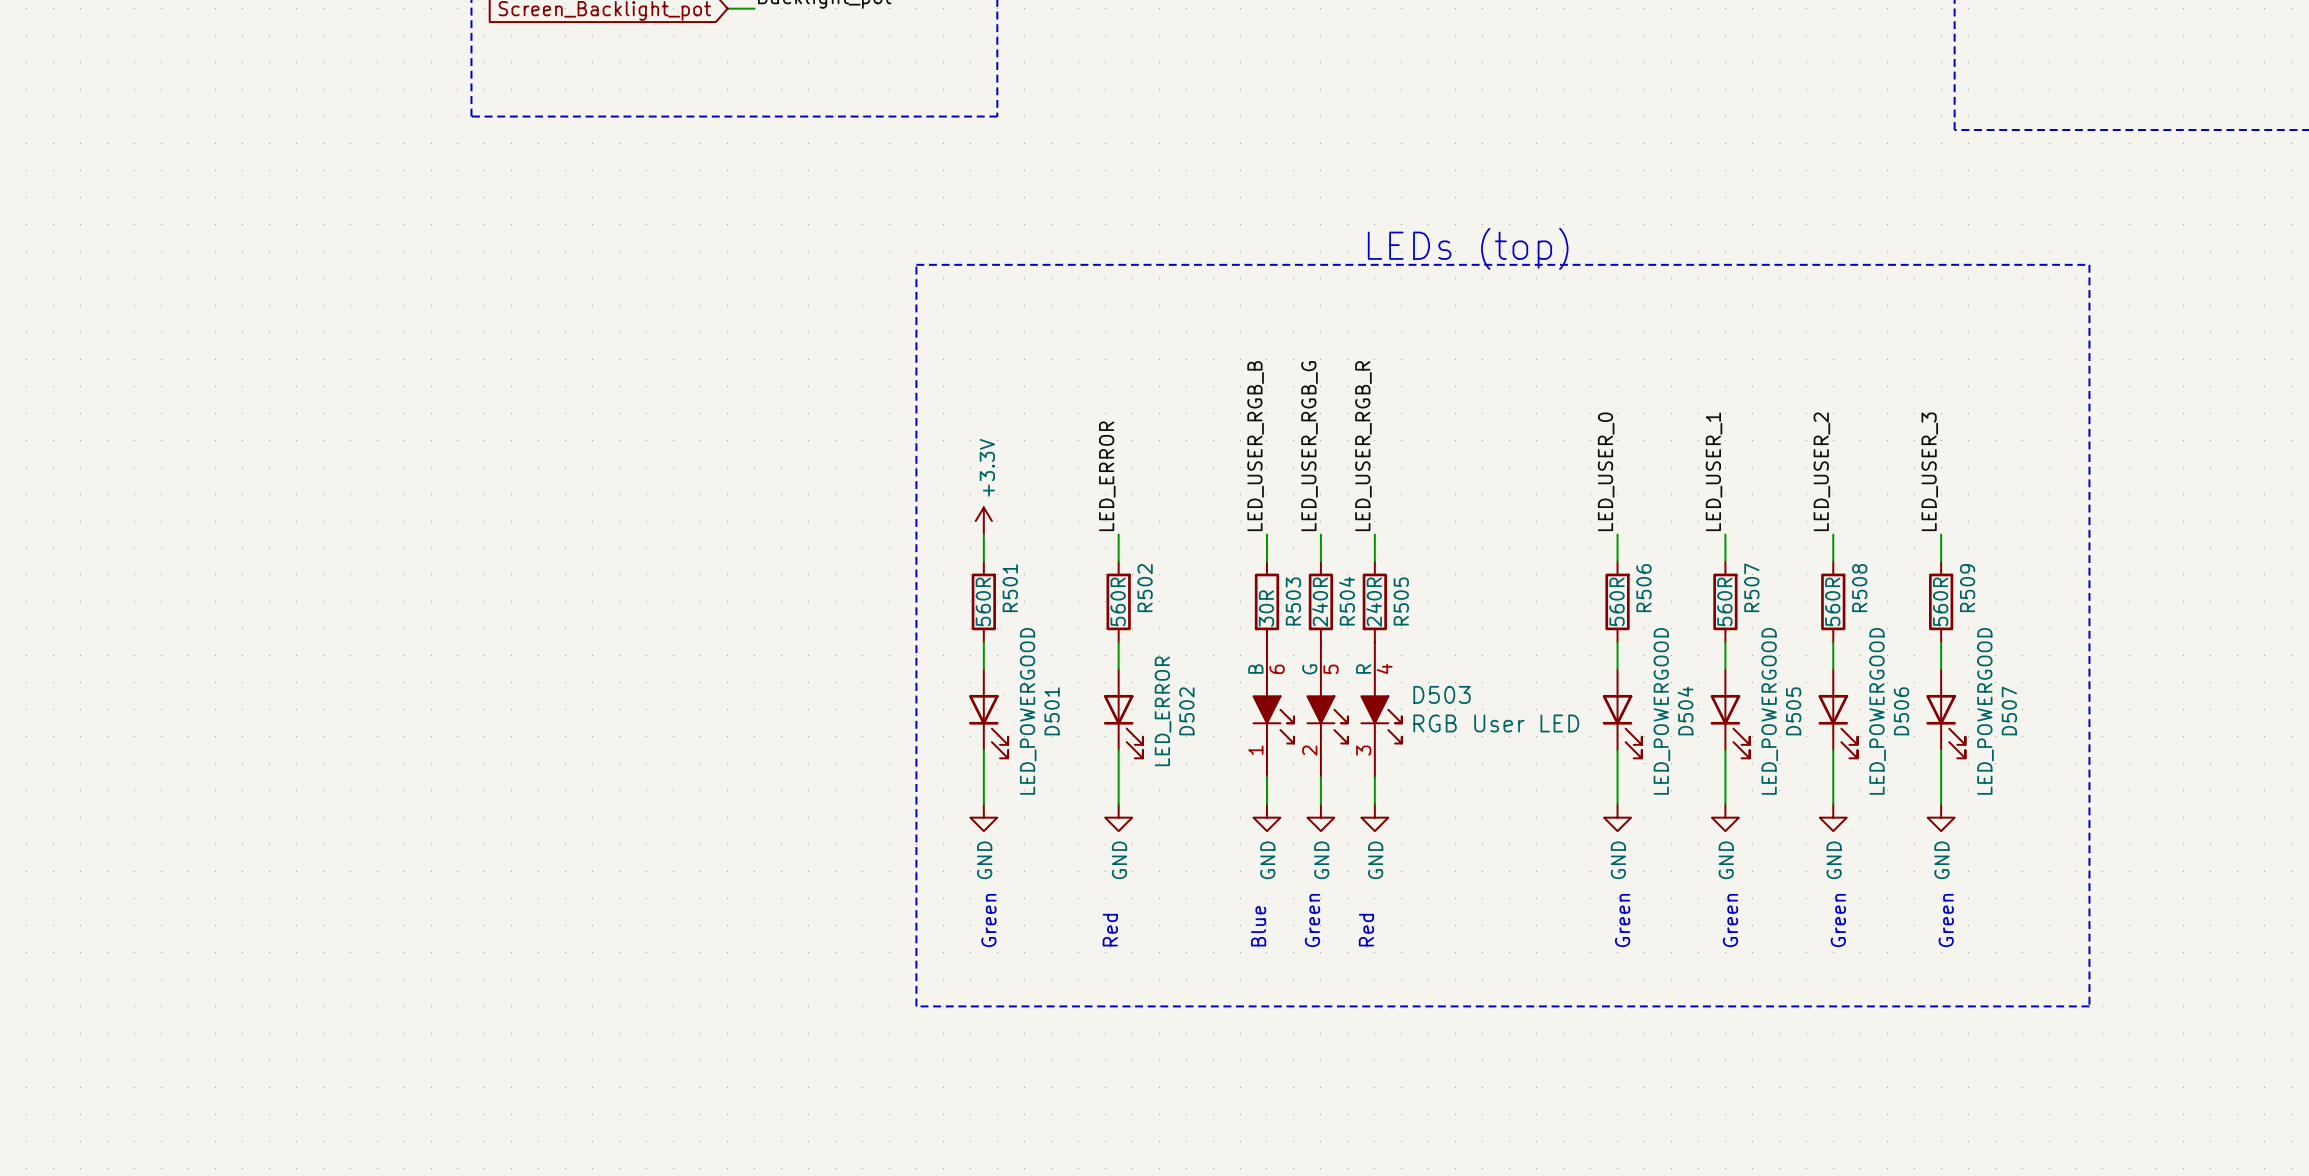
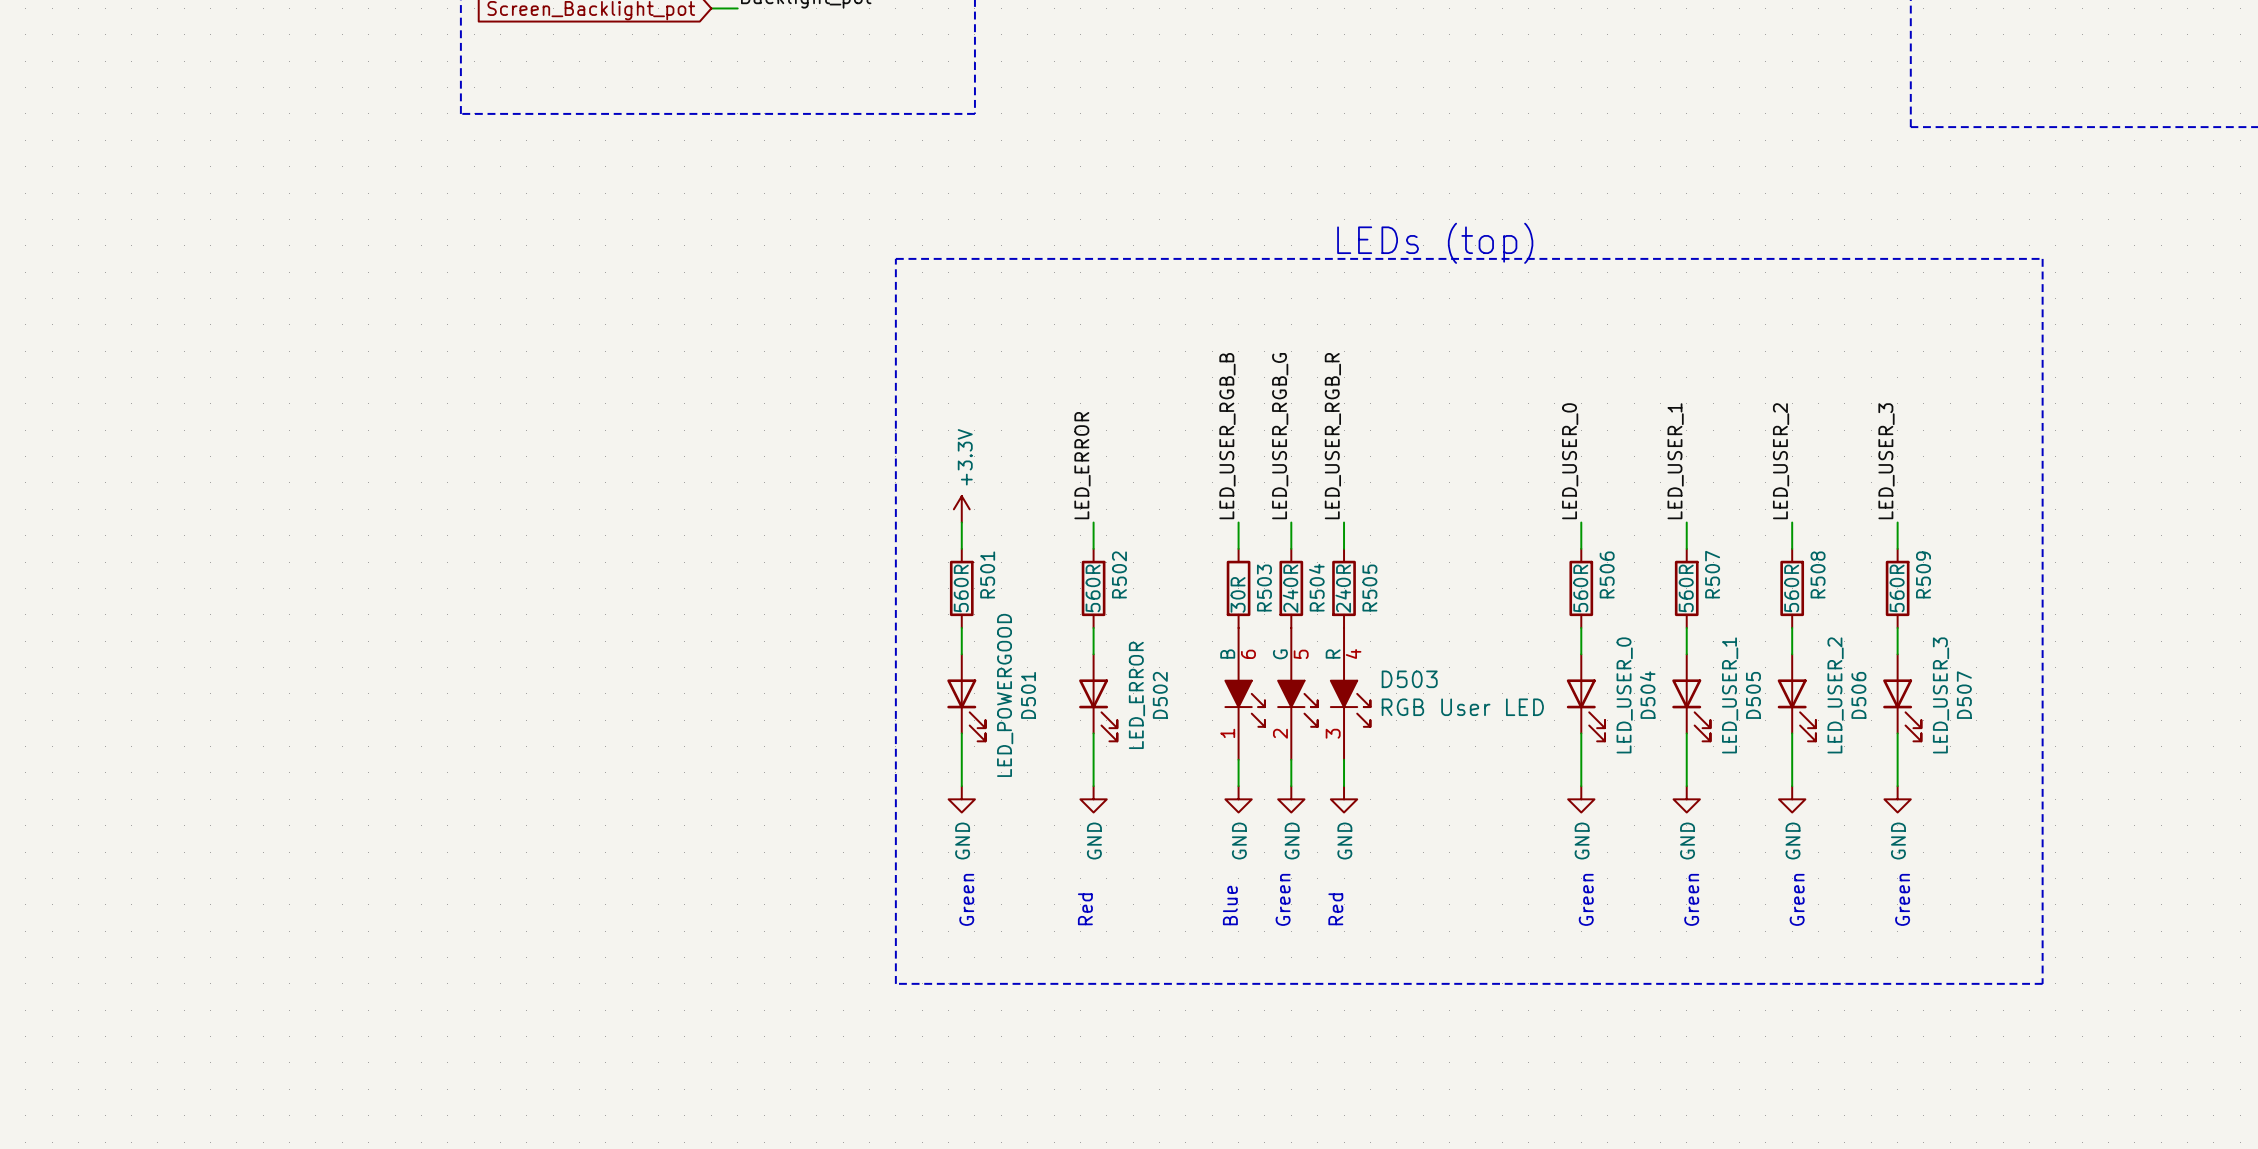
D504 value: LED_POWERGOOD (1661, 711) -> LED_USER_0 (1624, 695)
D505 value: LED_POWERGOOD (1769, 711) -> LED_USER_1 (1730, 695)
D506 value: LED_POWERGOOD (1877, 711) -> LED_USER_2 (1835, 695)
D507 value: LED_POWERGOOD (1985, 711) -> LED_USER_3 (1941, 695)

